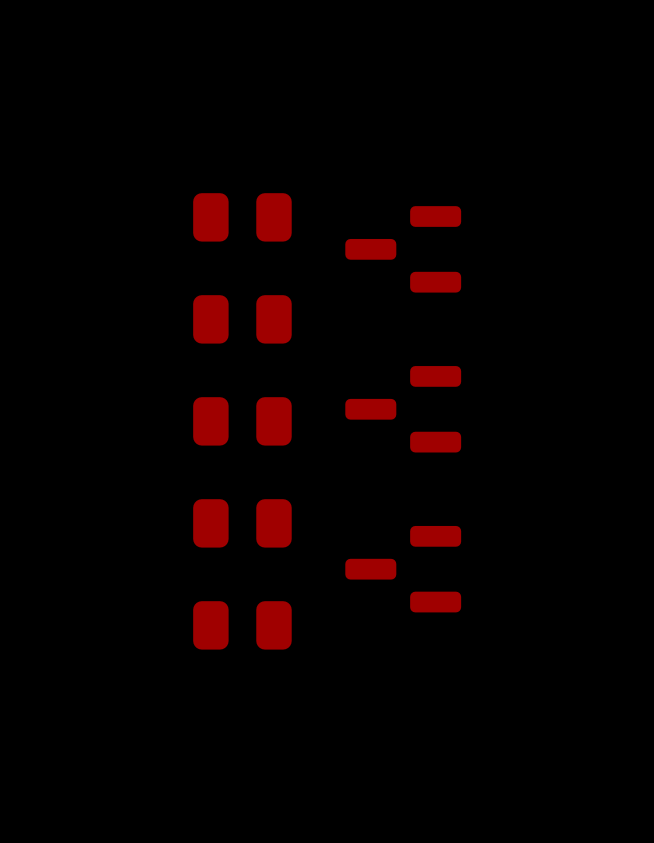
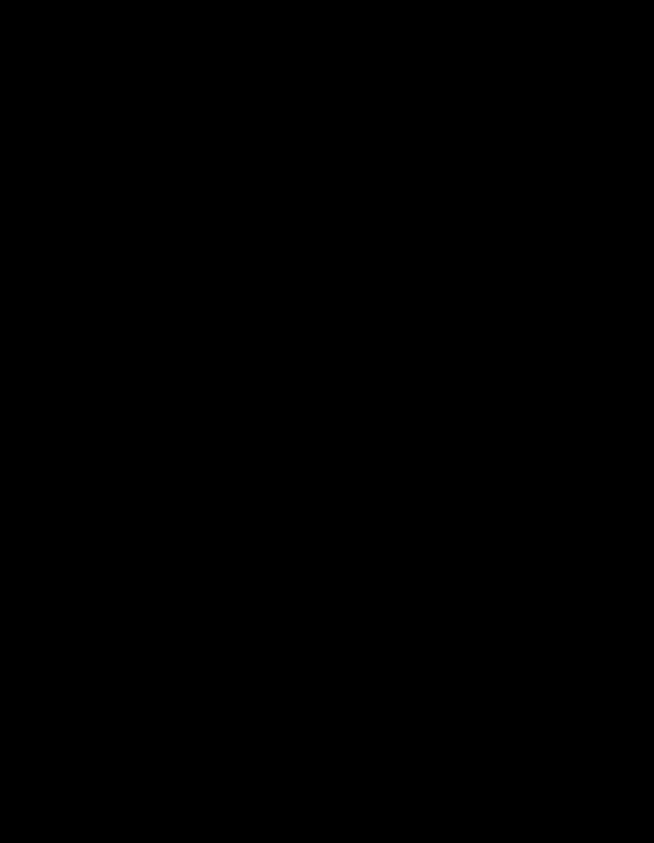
part: (242, 217) -> none
part: (403, 249) -> none
part: (242, 319) -> none
part: (403, 409) -> none
part: (242, 421) -> none
part: (242, 523) -> none
part: (403, 569) -> none
part: (242, 625) -> none

